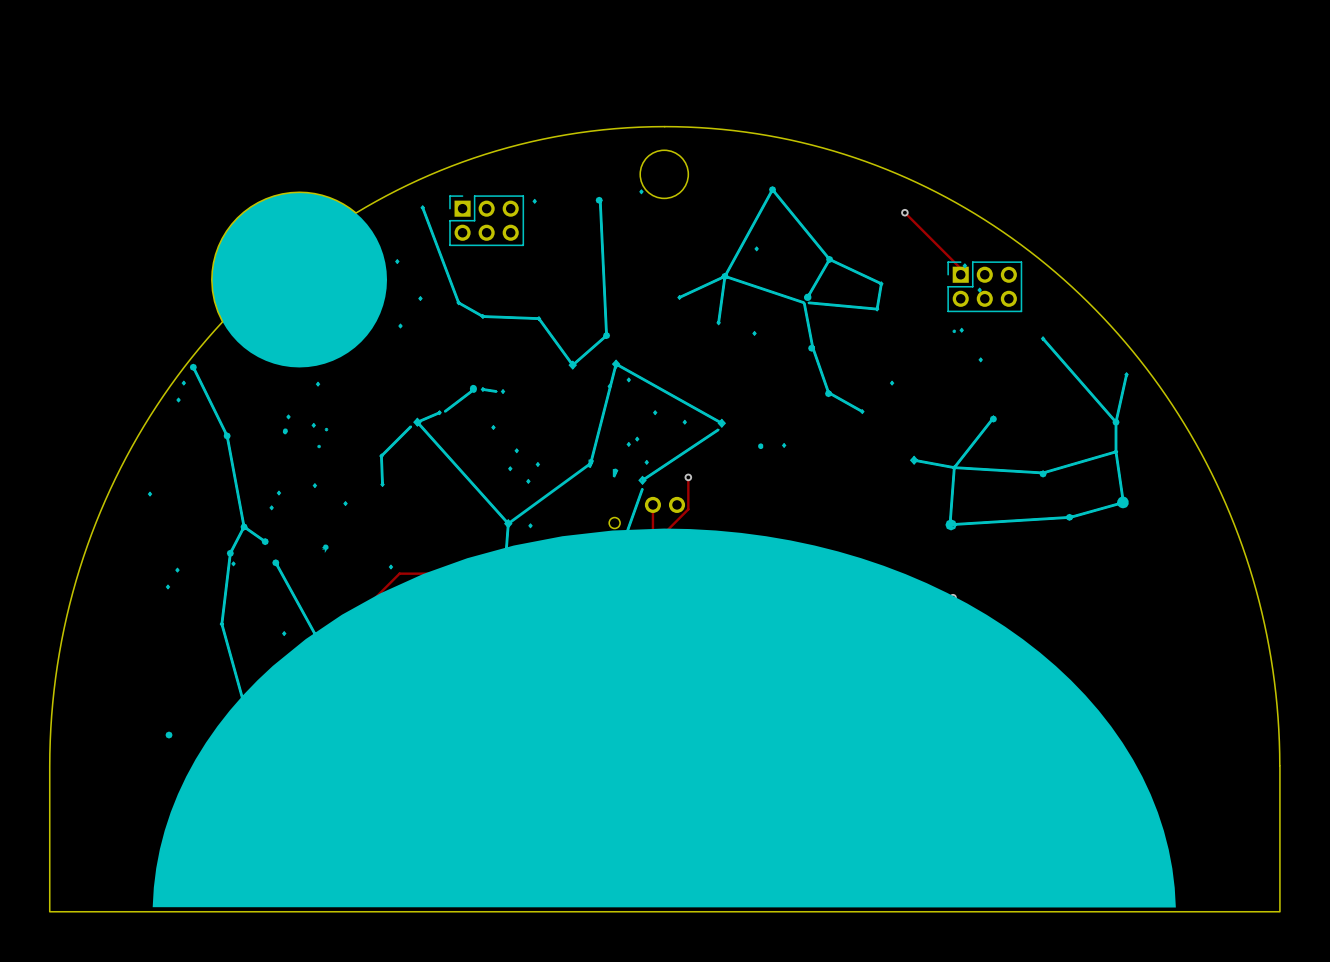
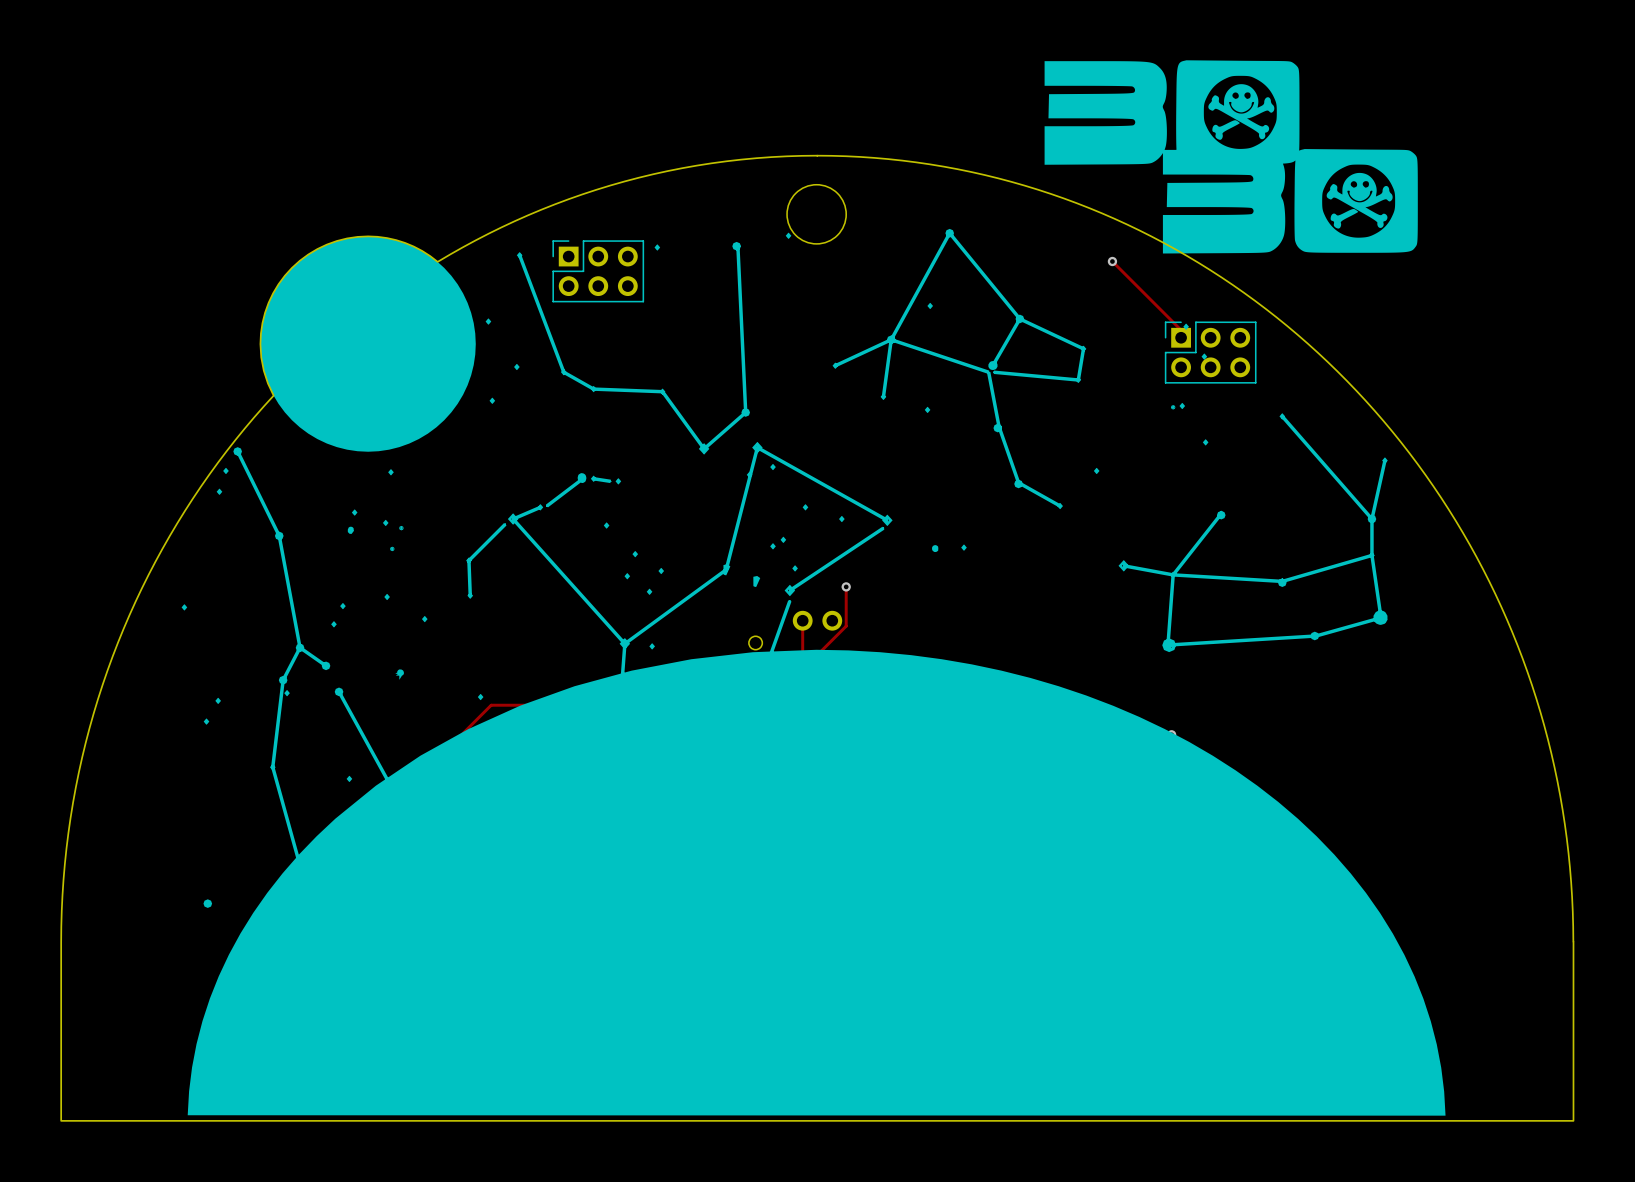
drawing: none -> [1044, 60, 1418, 254]

